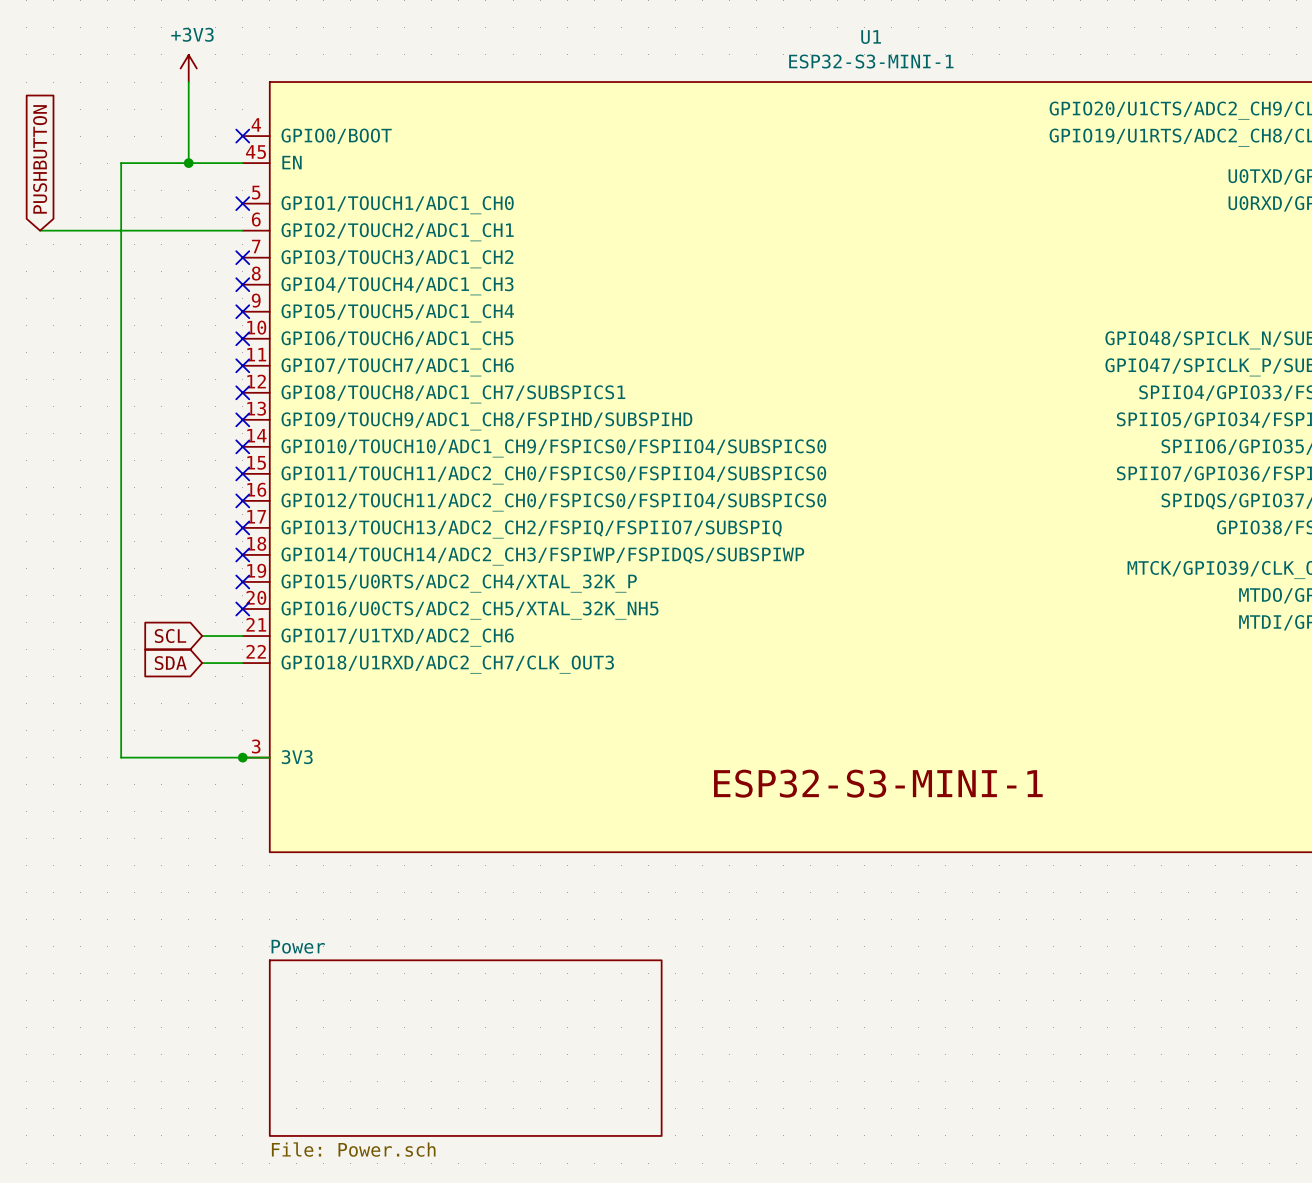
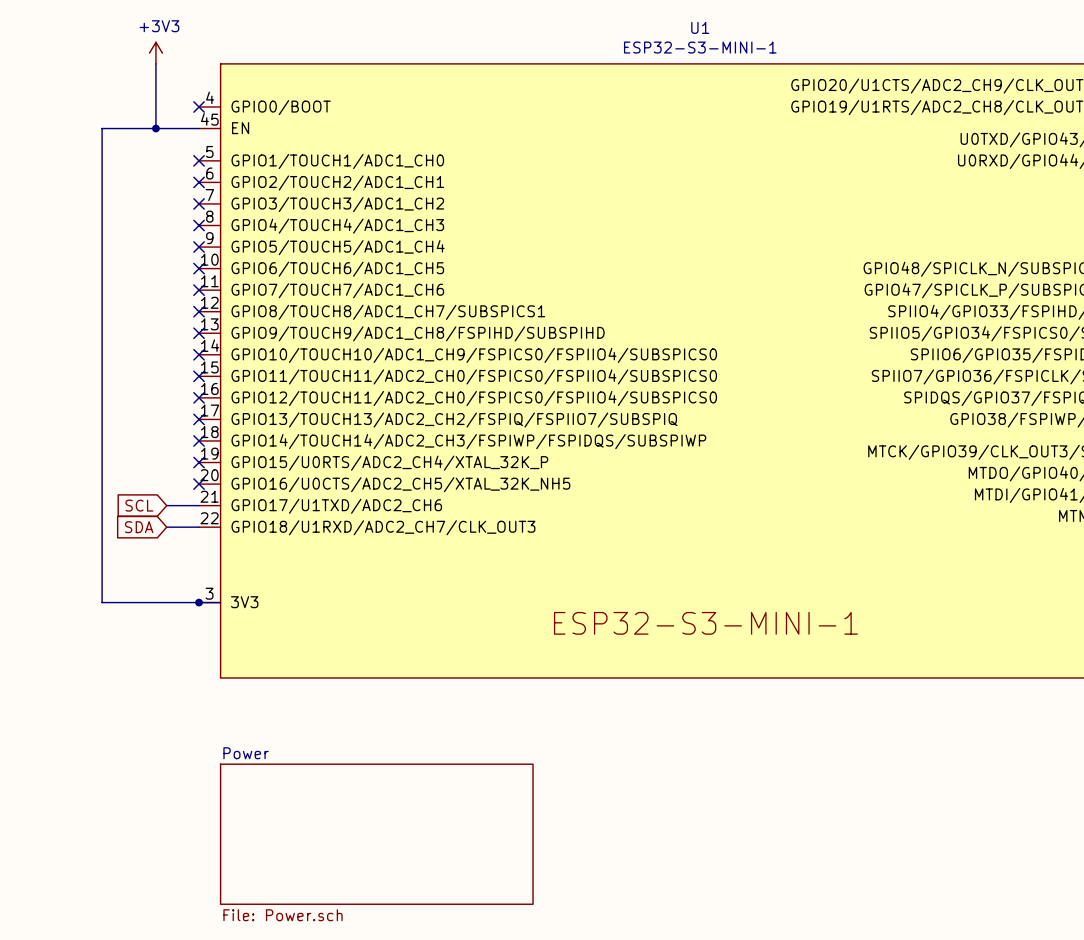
global label: PUSHBUTTON (40, 159) -> none
wire: (40, 230) (242, 230) -> none
no-connect mark: none -> (199, 182)

